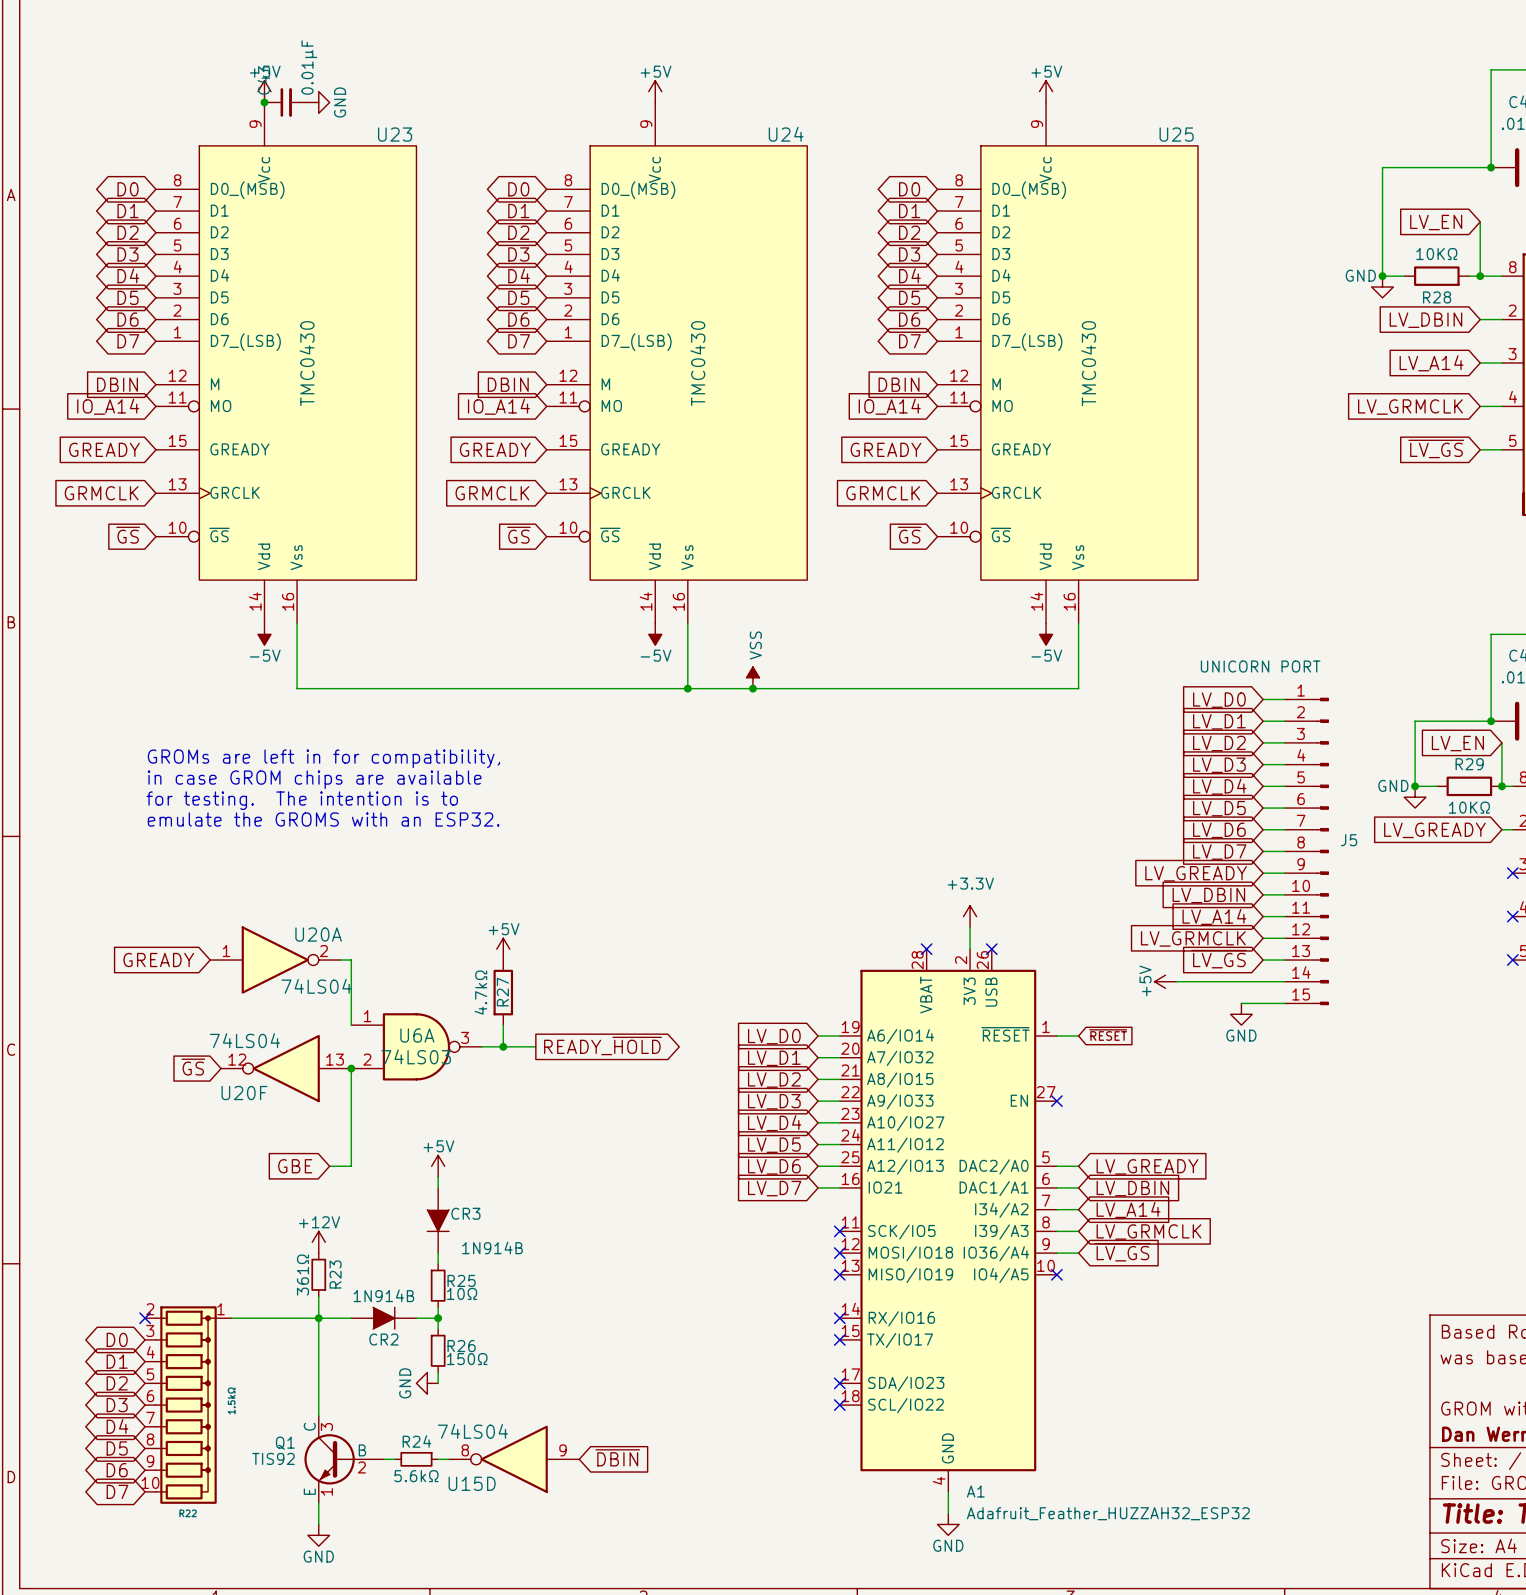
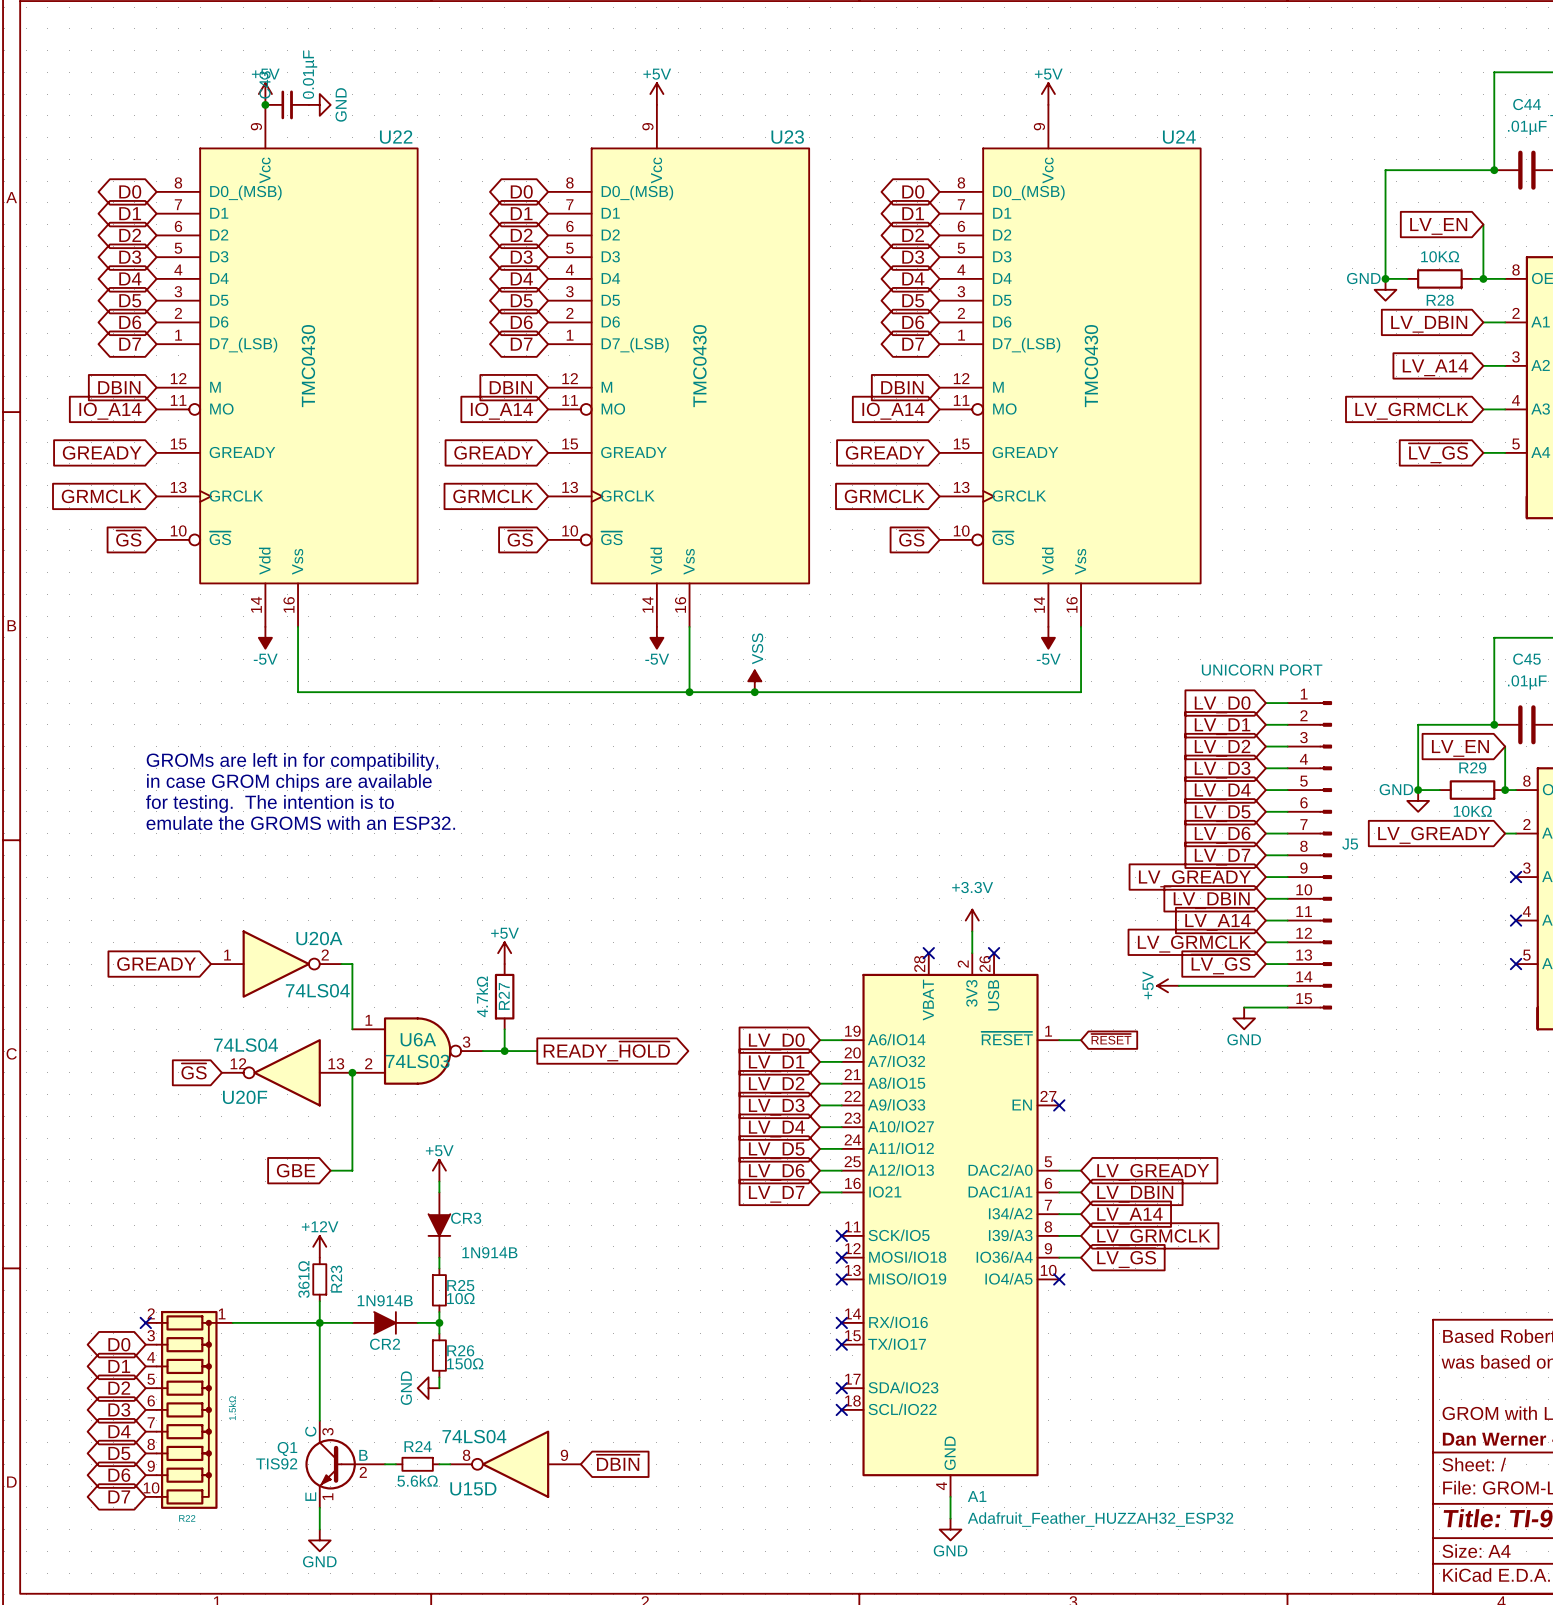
U23 name: U23 (395, 134) -> U22 (396, 137)
U24 name: U24 (786, 134) -> U23 (787, 137)
U25 name: U25 (1176, 134) -> U24 (1179, 137)

